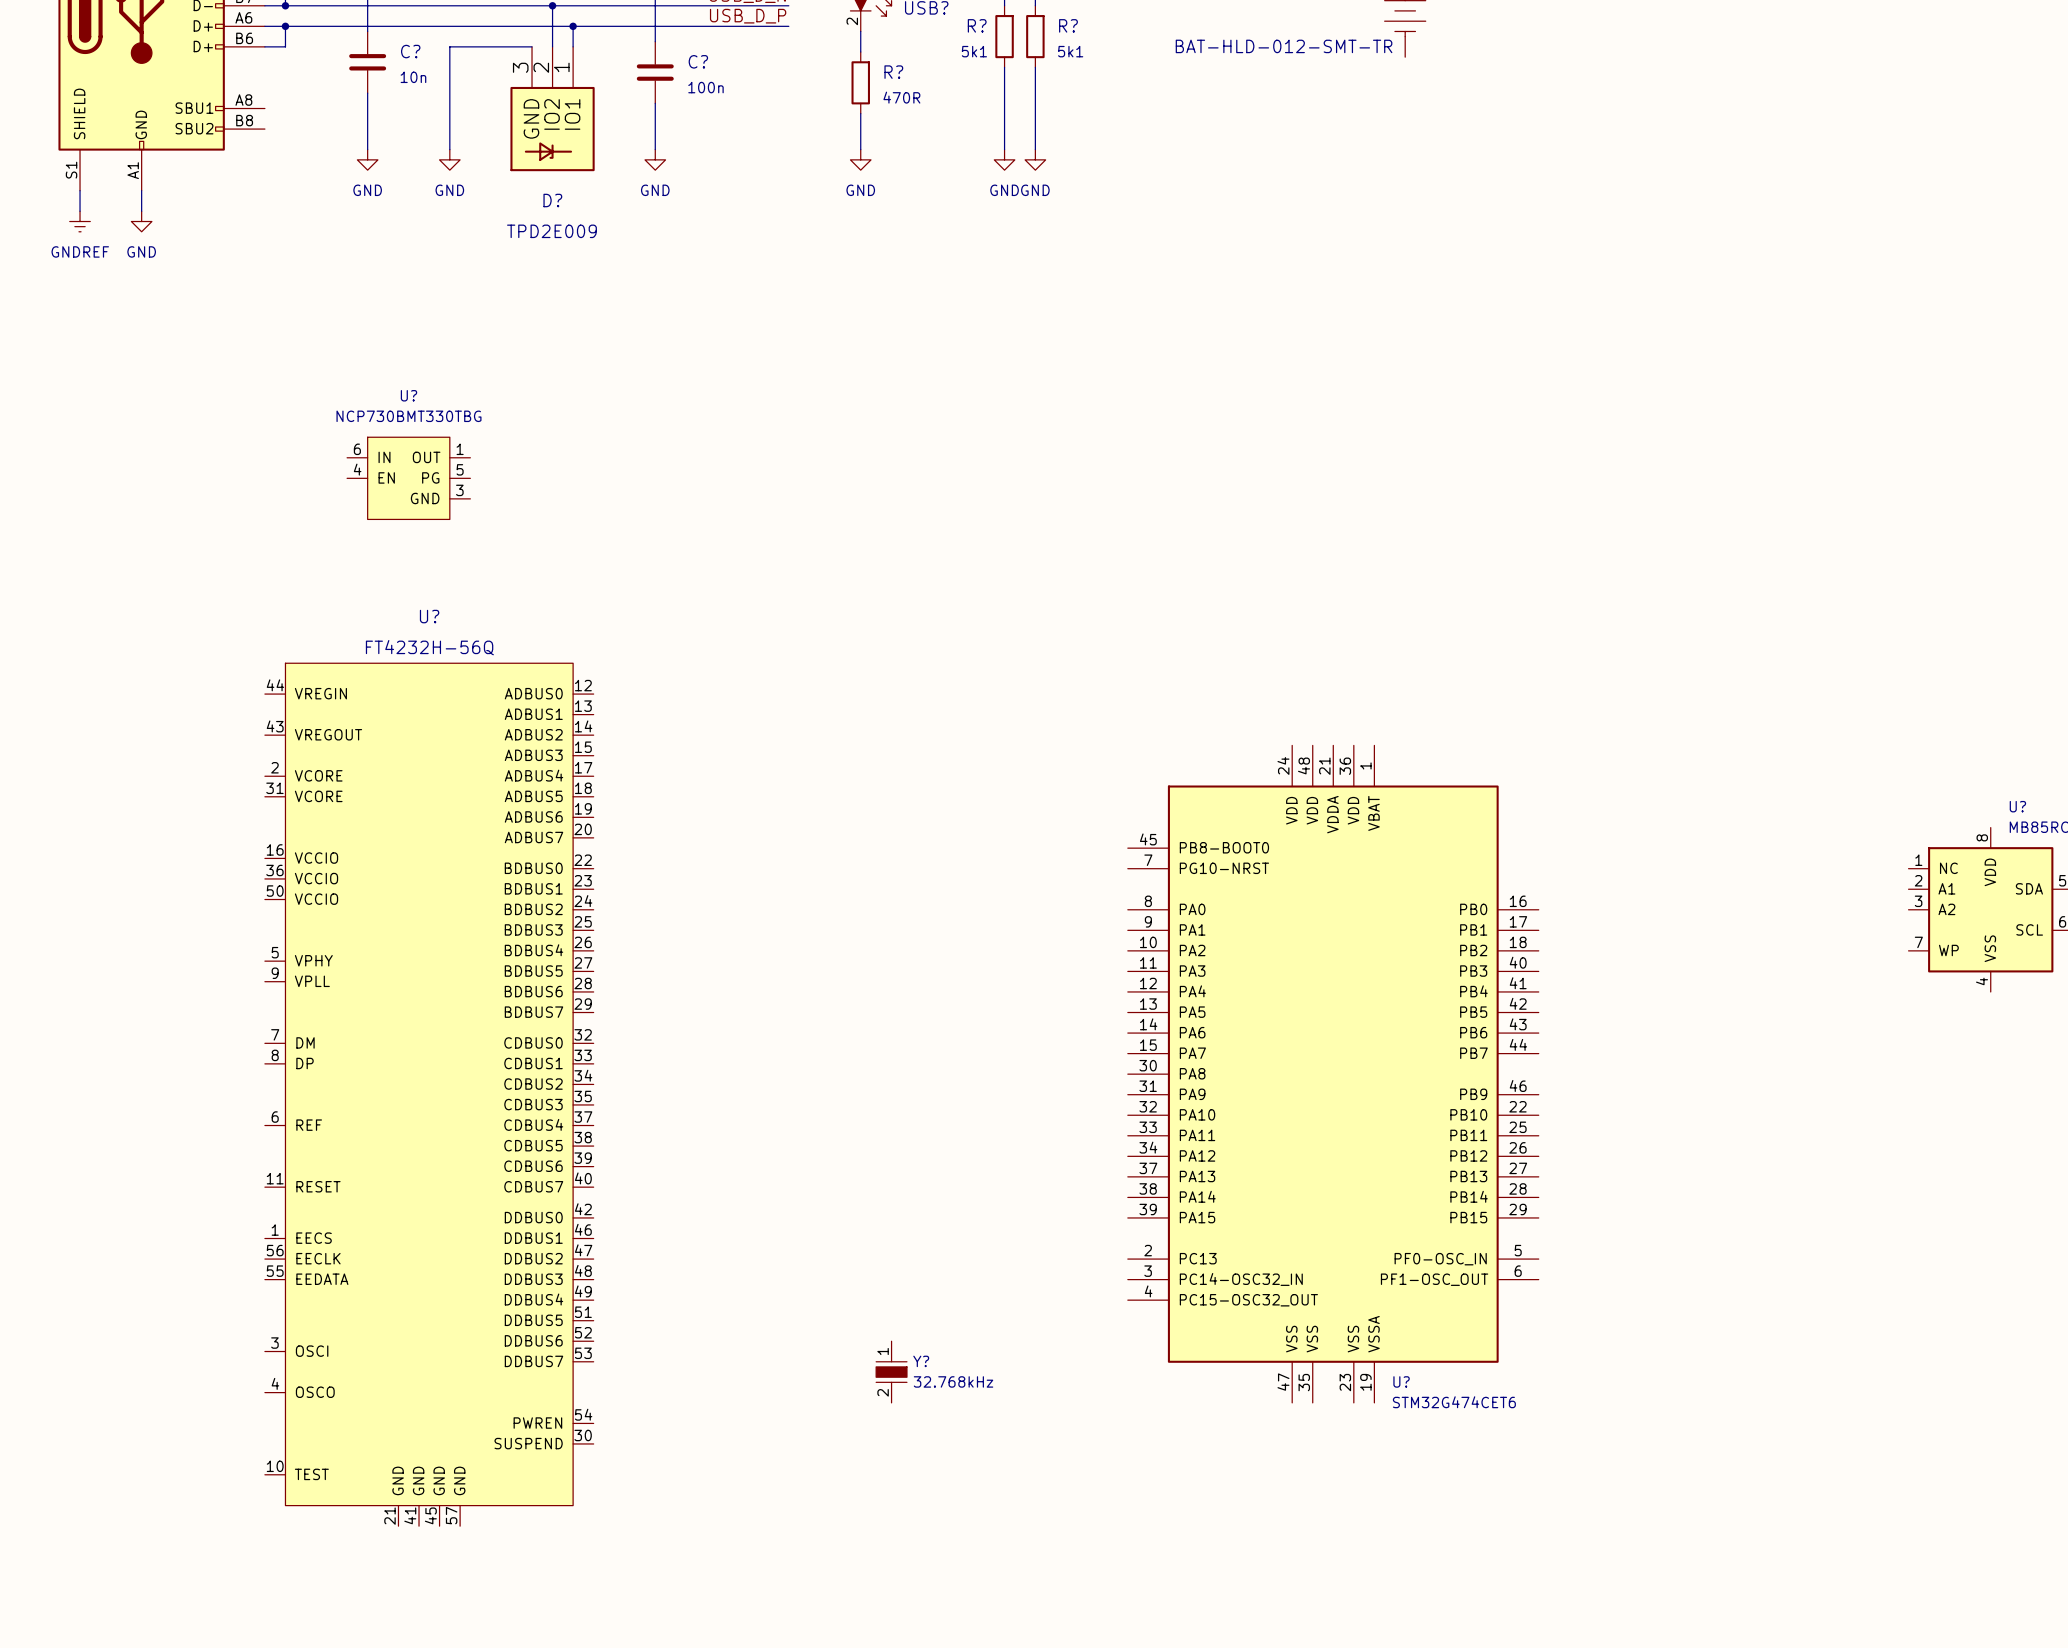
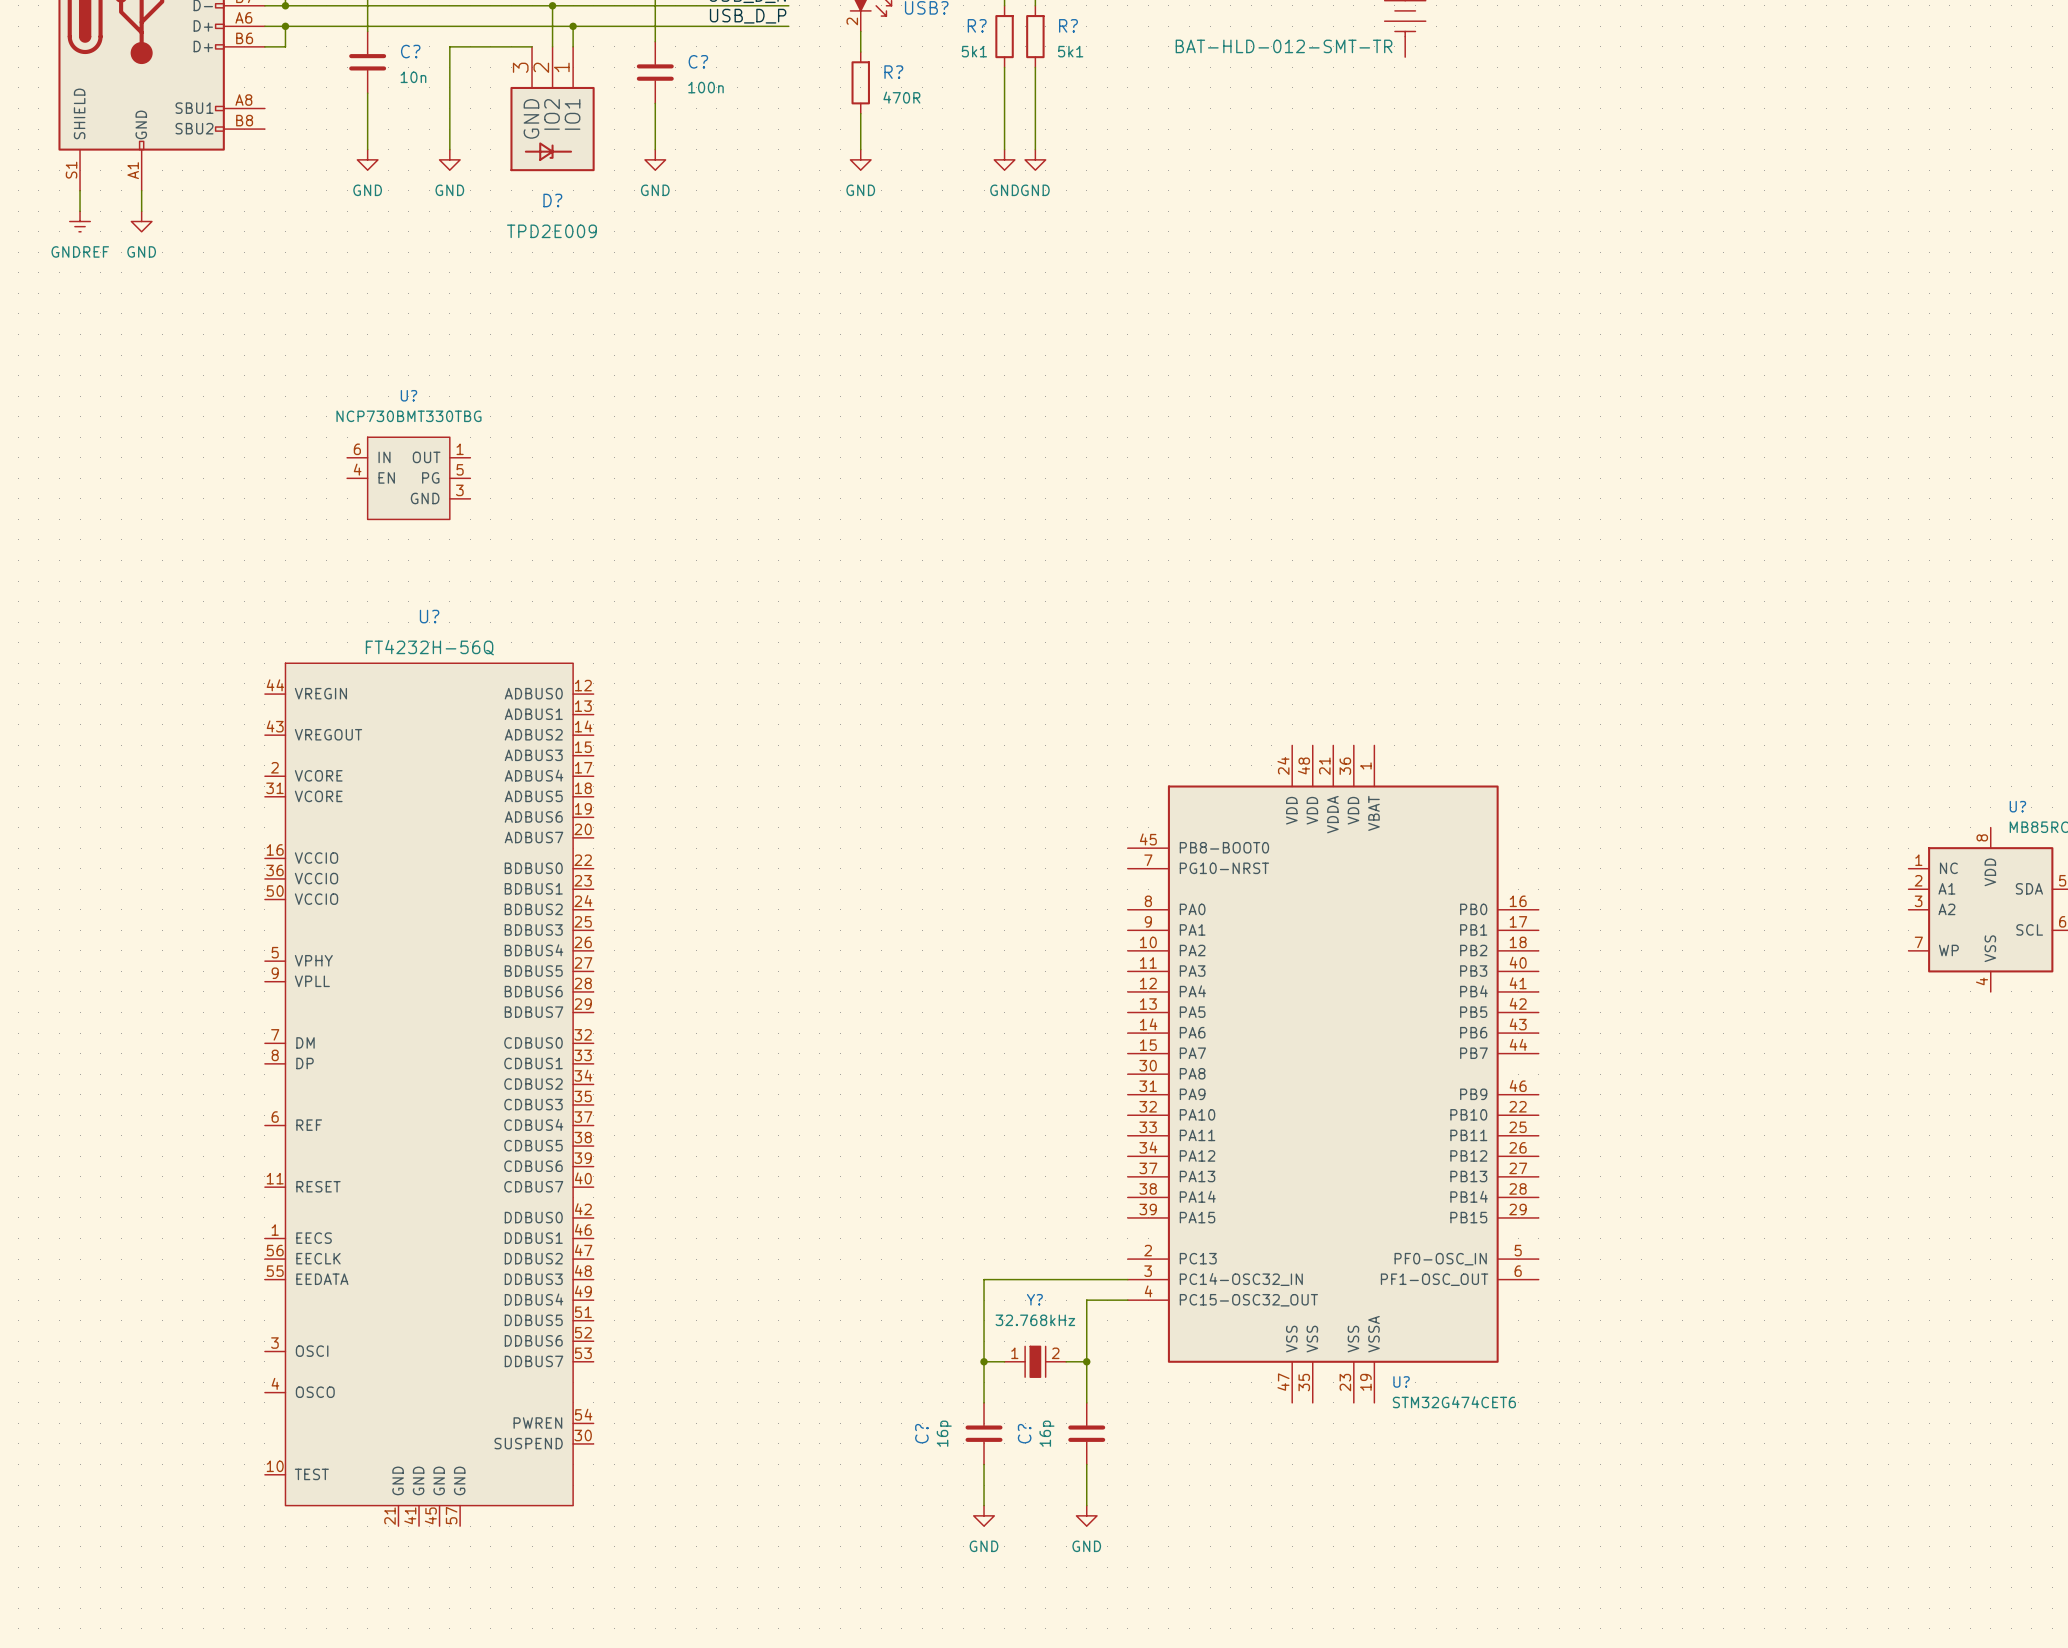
wire: none -> (1127, 1279) (984, 1279) (984, 1402)
wire: none -> (1127, 1300) (1086, 1300) (1086, 1402)
Y? name position: Y? (921, 1361) -> Y? (1034, 1299)
wire: none -> (984, 1361) (1004, 1361)
junction: none -> (984, 1361)
wire: none -> (1066, 1361) (1086, 1361)
junction: none -> (1086, 1361)
Y? rotation: 0° (891, 1372) -> 90° counterclockwise (1035, 1361)
Y? position: (891, 1372) -> (1035, 1361)
Y? text position: 32.768kHz (953, 1381) -> 32.768kHz (1035, 1320)
C?: none -> (984, 1433)
C?: none -> (1086, 1433)
wire: none -> (984, 1464) (984, 1505)
wire: none -> (1086, 1464) (1086, 1505)
power symbol: none -> GND (984, 1515)
power symbol: none -> GND (1086, 1515)

